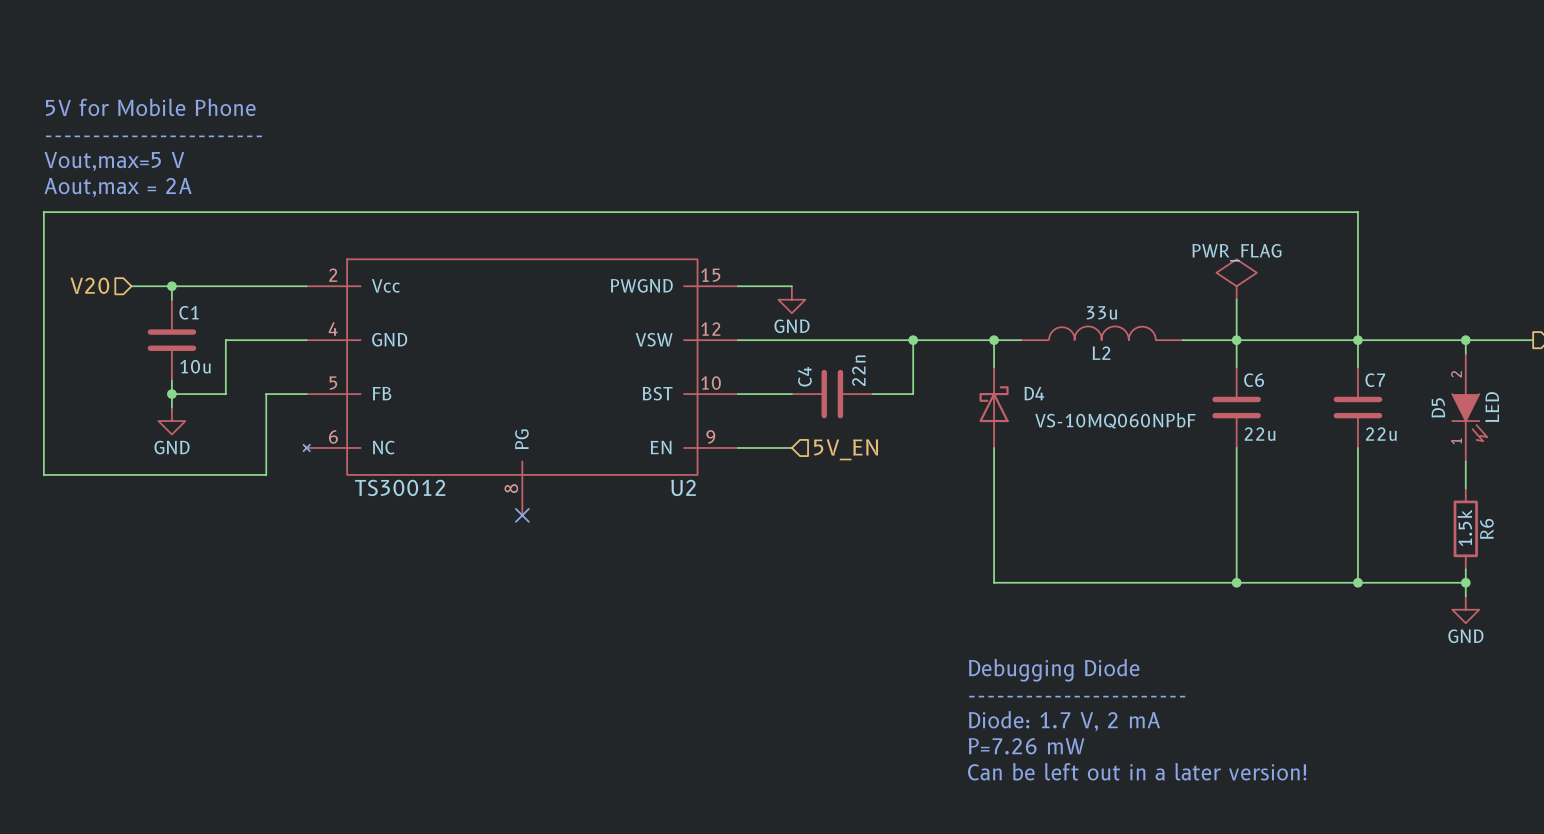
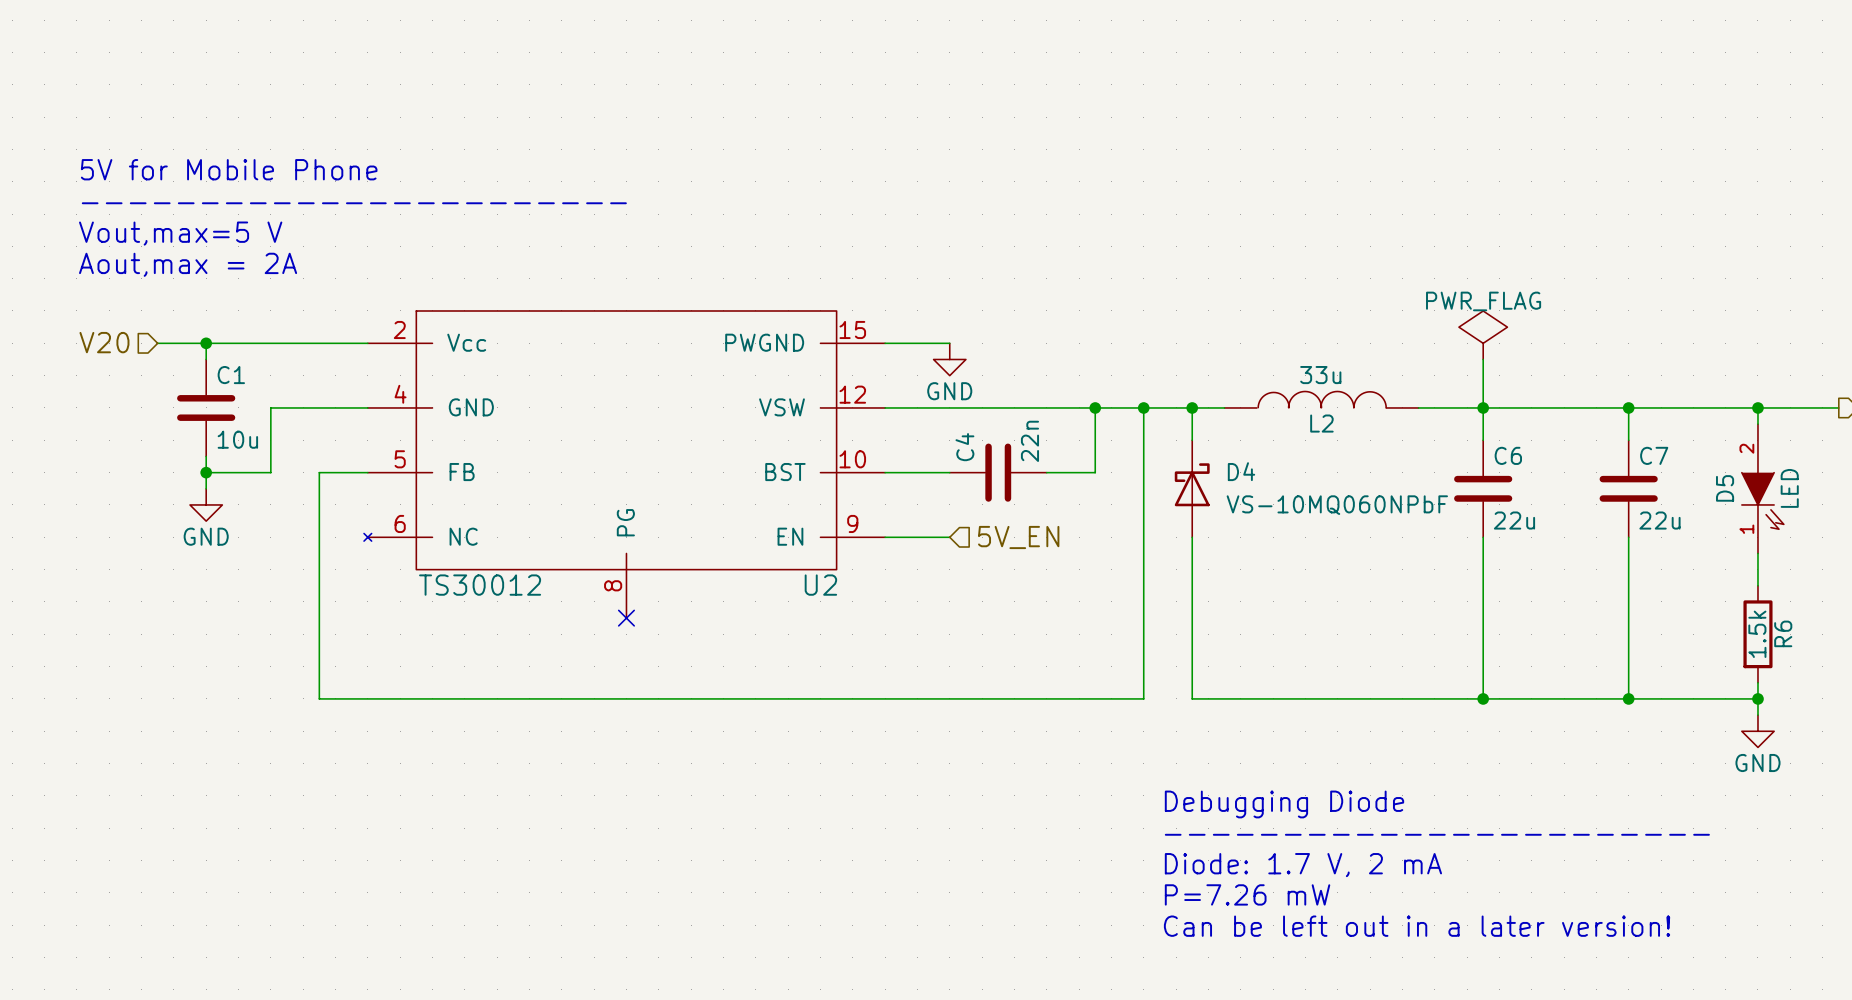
text position: 5V for Mobile Phone (150, 107) -> 5V for Mobile Phone (229, 169)
text position: ----------------------- (154, 136) -> ----------------------- (354, 203)
text position: Vout,max=5 V (114, 161) -> Vout,max=5 V (180, 233)
text position: Aout,max = 2A (118, 187) -> Aout,max = 2A (188, 264)
junction: none -> (1143, 407)
wire: (1357, 340) (1357, 212) (43, 212) (43, 474) (266, 474) -> (1143, 407) (1143, 698) (319, 698) (319, 569)

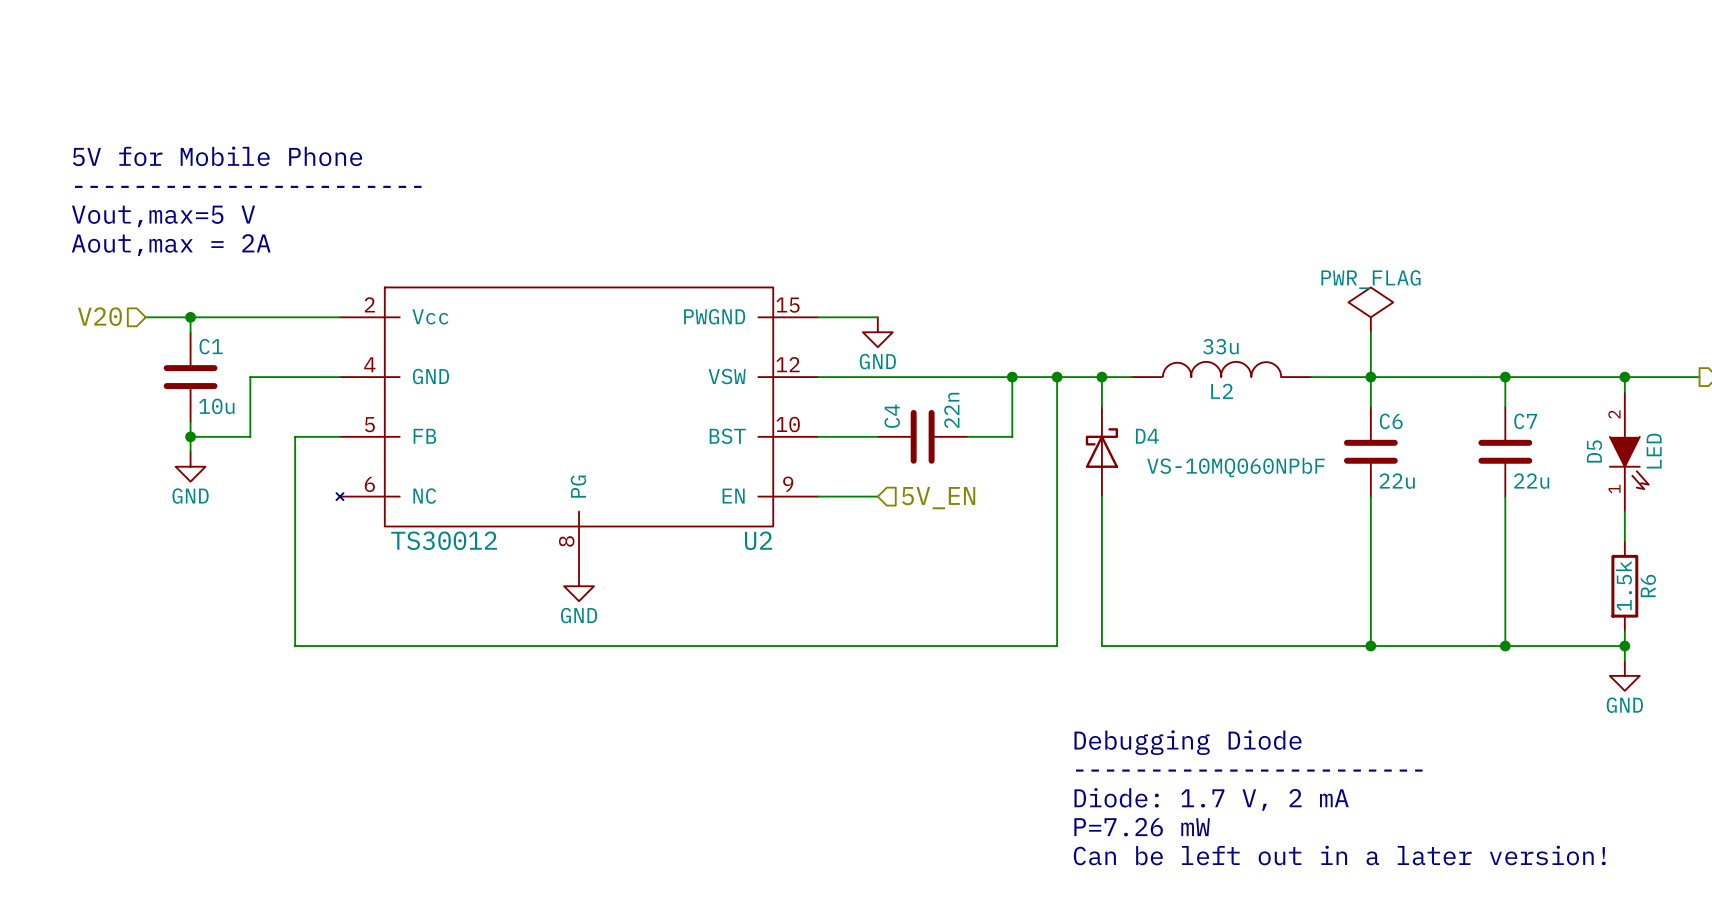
no-connect mark: (626, 618) -> none
power symbol: none -> GND (579, 586)

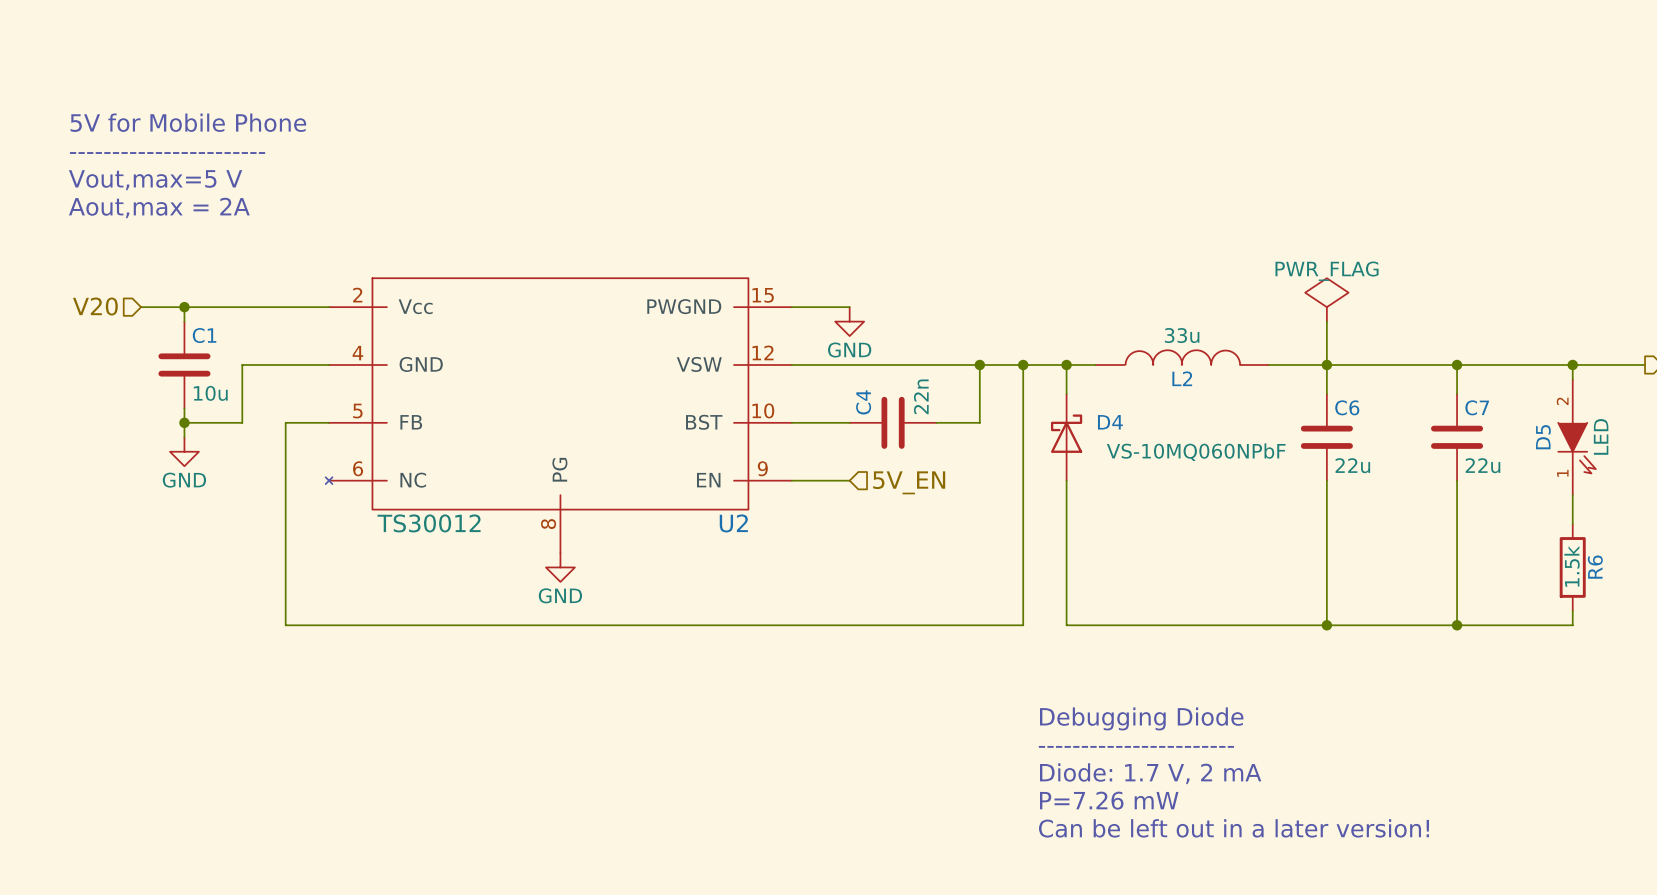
text: none -> 5V for Mobile Phone (188, 122)
text: 5V for Mobile Phone (217, 156) -> ----------------------- (167, 153)
text: ----------------------- (248, 186) -> Vout,max=5 V (155, 180)
text: Vout,max=5 V (163, 216) -> Aout,max = 2A (159, 207)
text: Aout,max = 2A (171, 245) -> none
wire: (1624, 646) (1624, 660) -> none
junction: (1624, 646) -> none
power symbol: GND (1624, 675) -> none

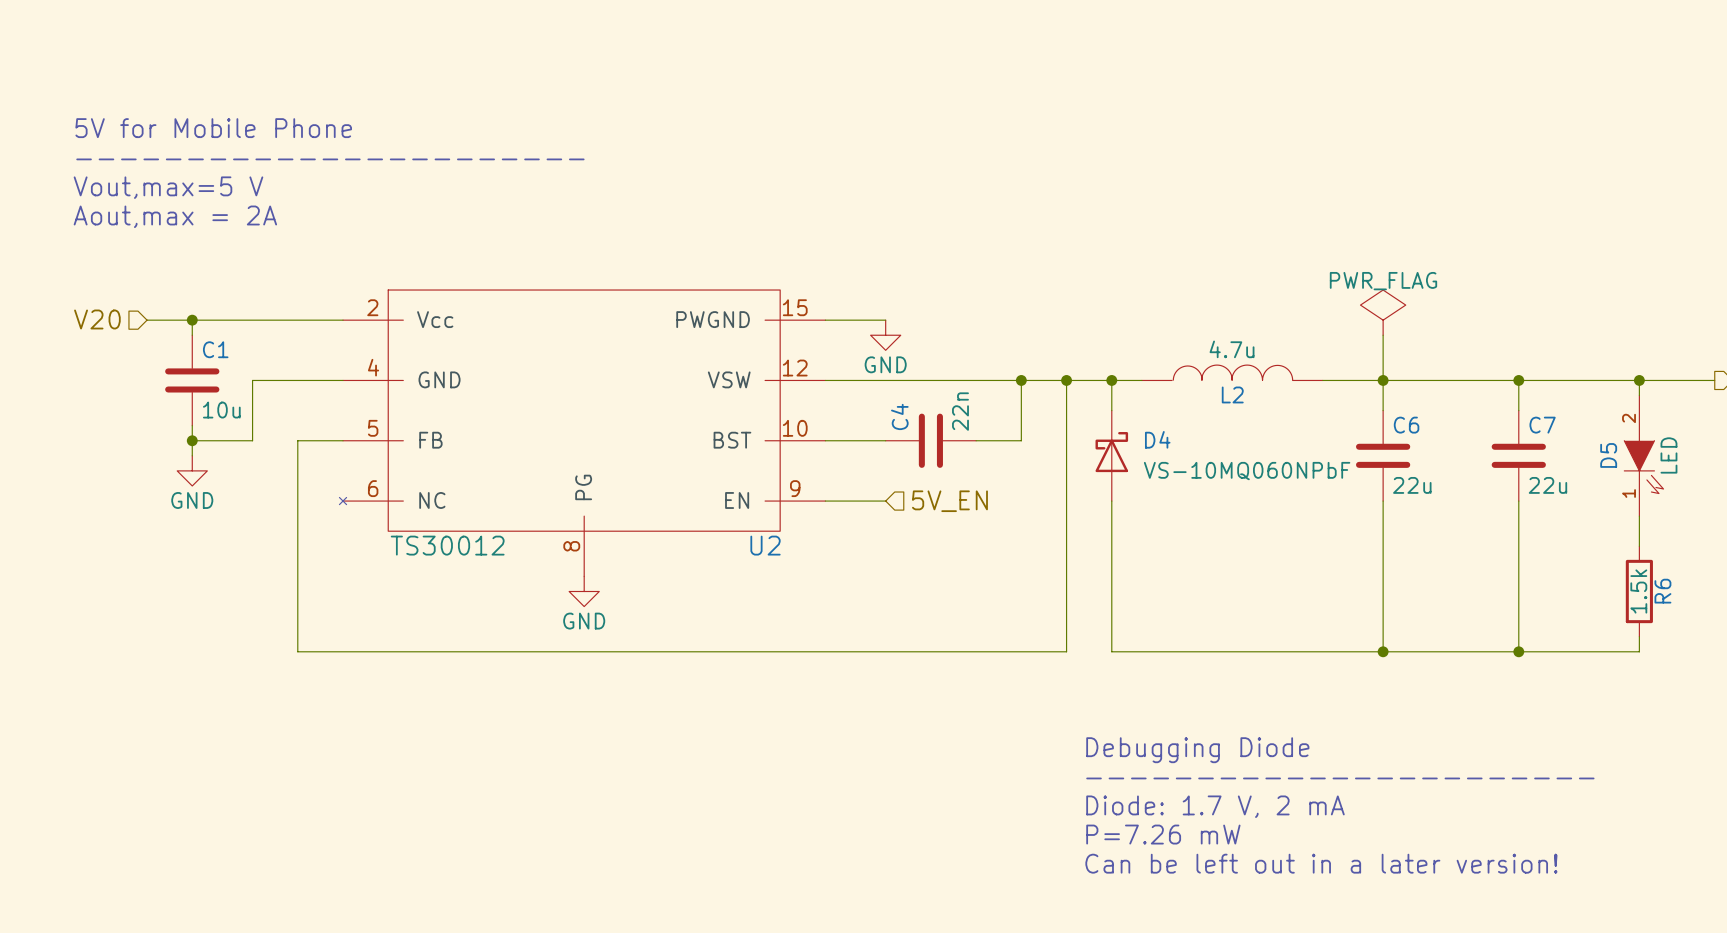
L2 value: 33u (1182, 335) -> 4.7u (1232, 349)

